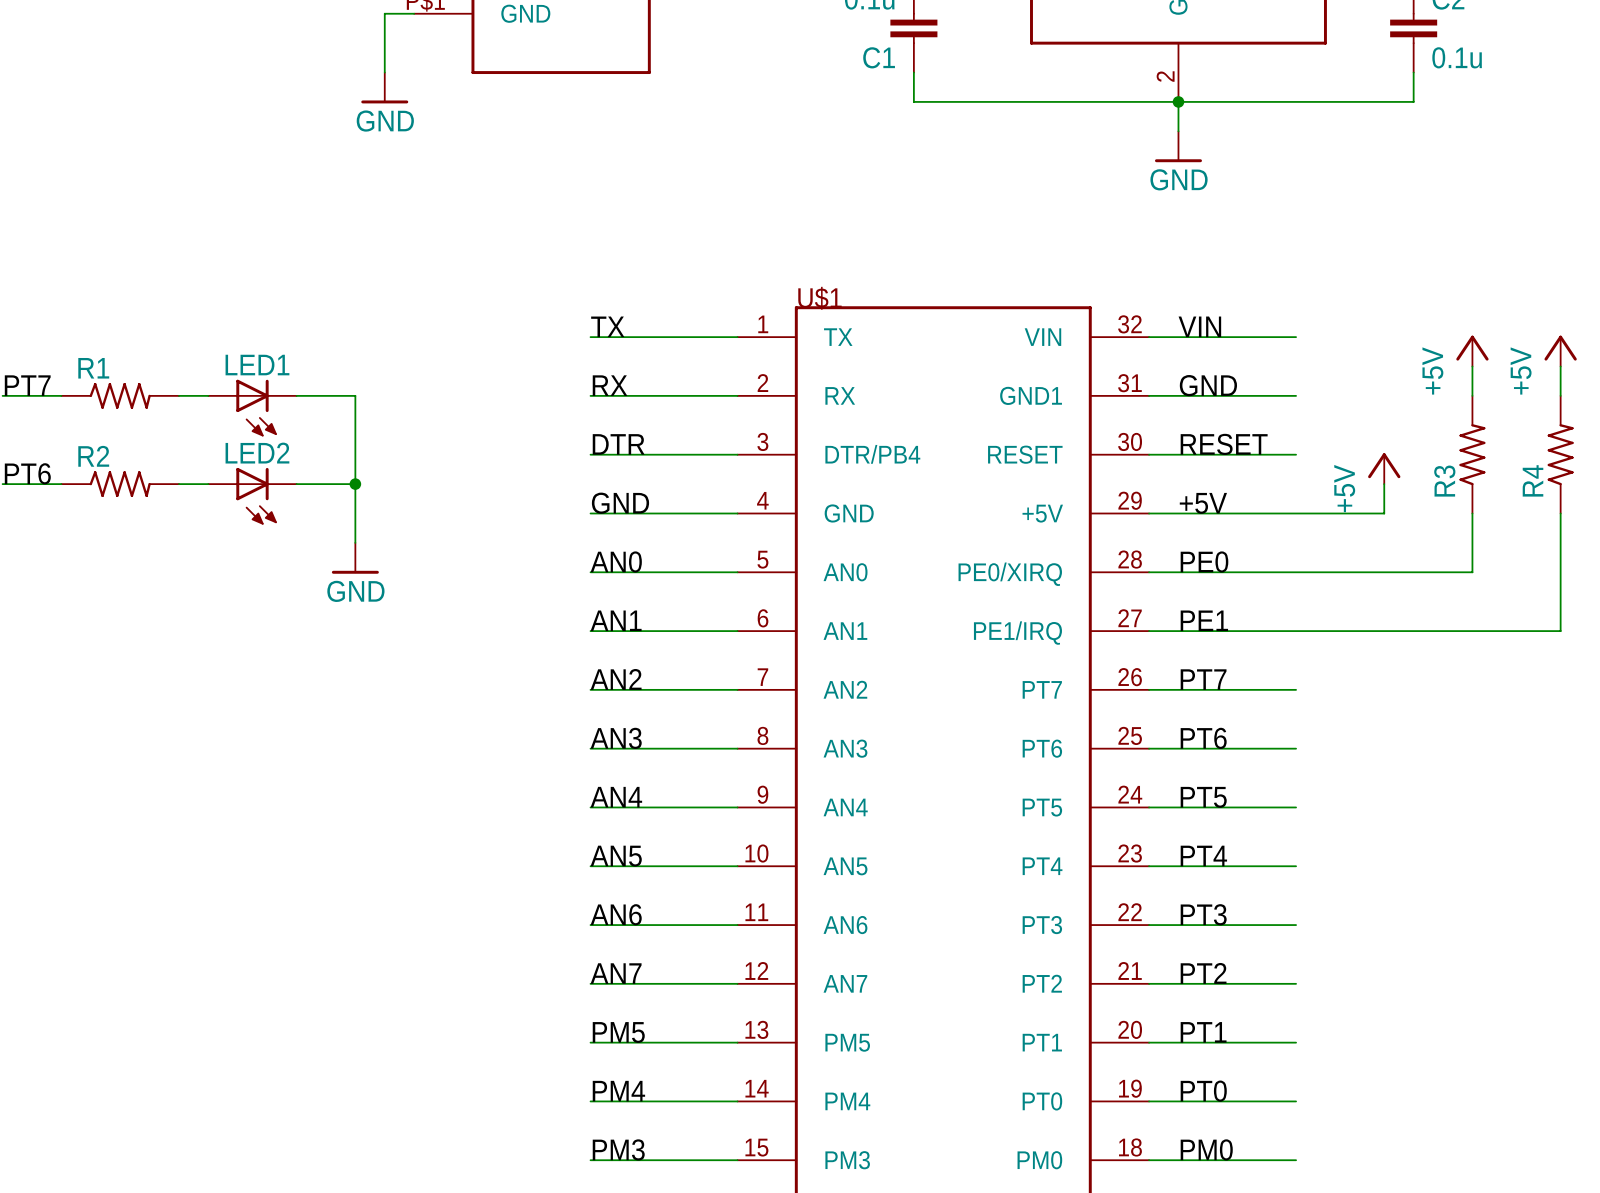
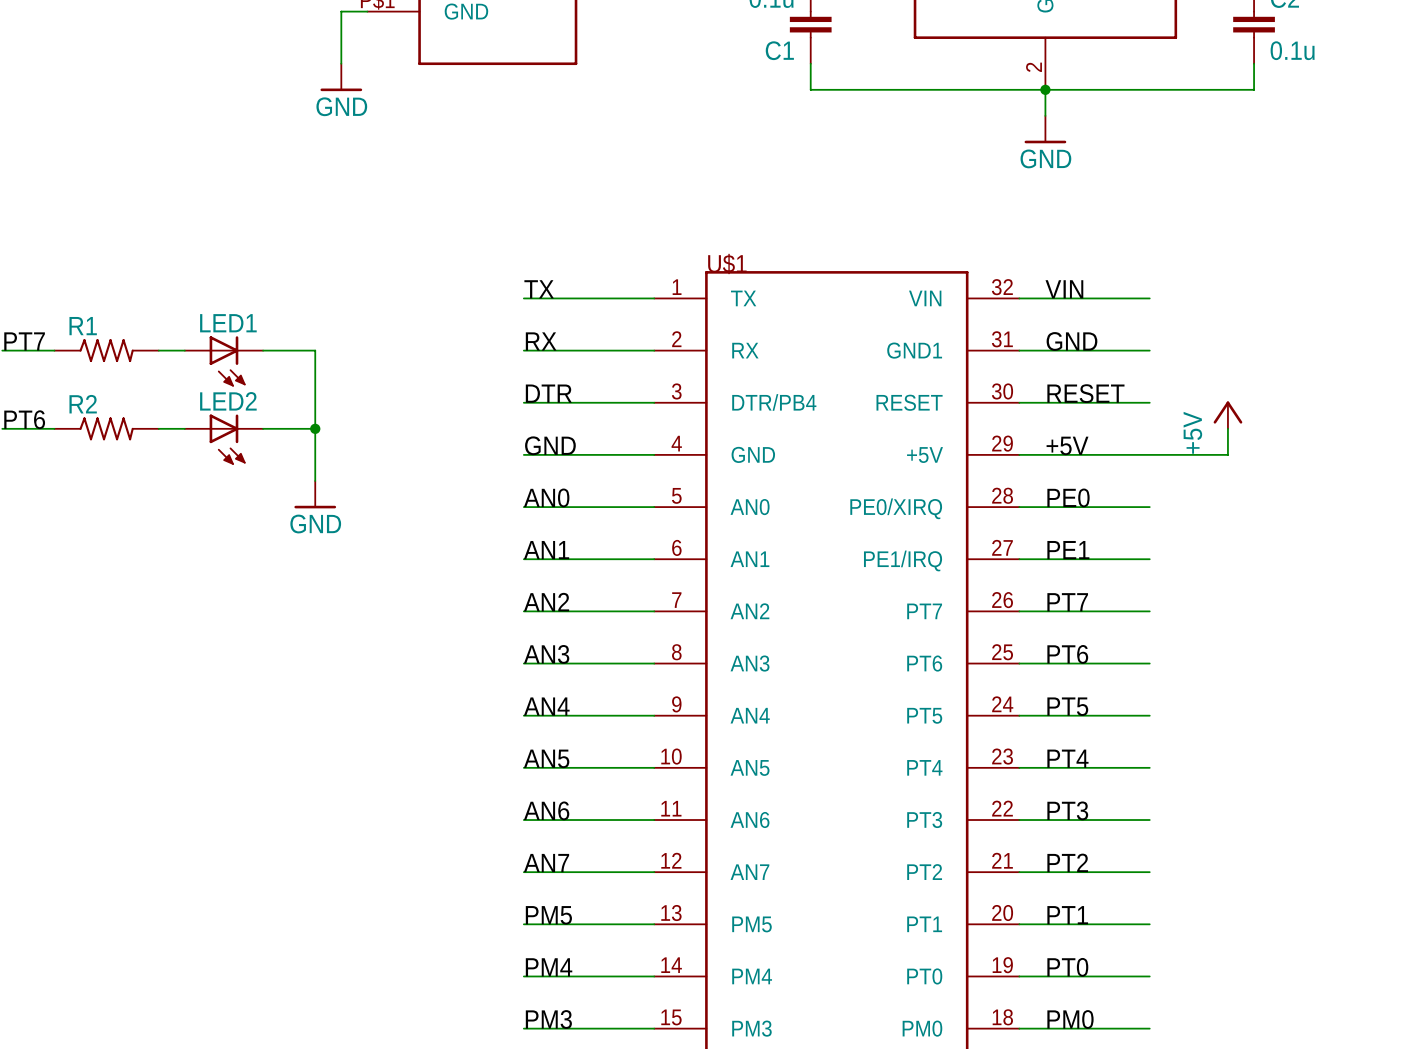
power symbol: +5V (1472, 351) -> none
power symbol: +5V (1560, 351) -> none
wire: (1472, 366) (1472, 395) -> none
wire: (1560, 366) (1560, 395) -> none
R3: (1472, 454) -> none
R4: (1560, 454) -> none
wire: (1472, 513) (1472, 572) (1296, 572) -> none
wire: (1560, 513) (1560, 631) (1296, 631) -> none

